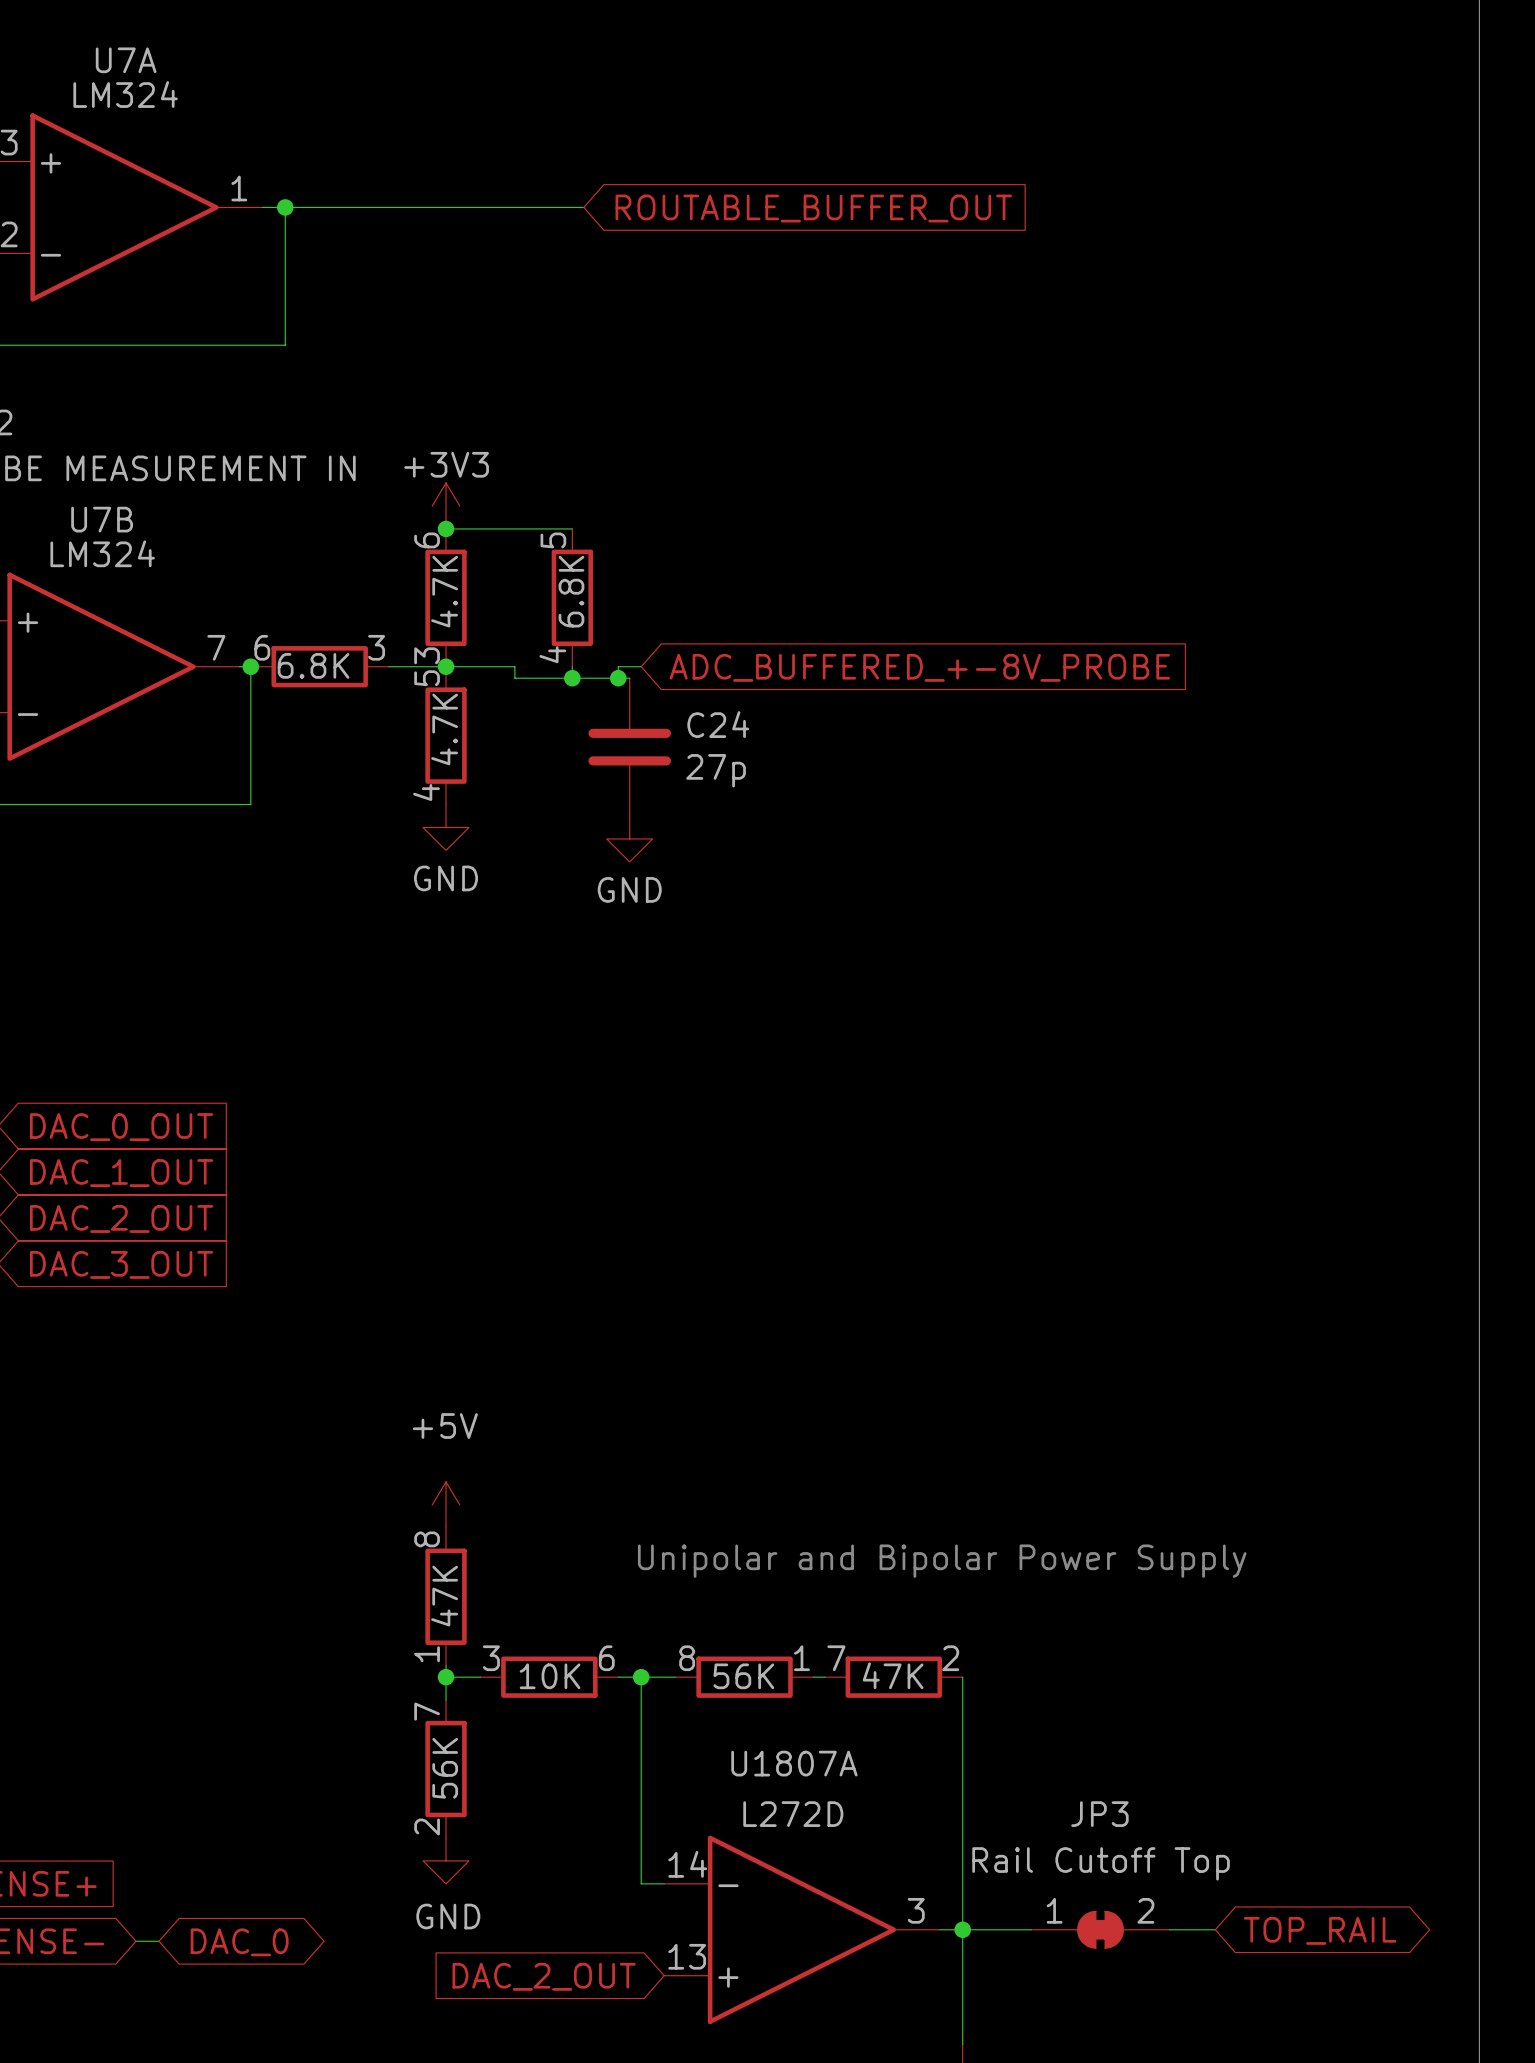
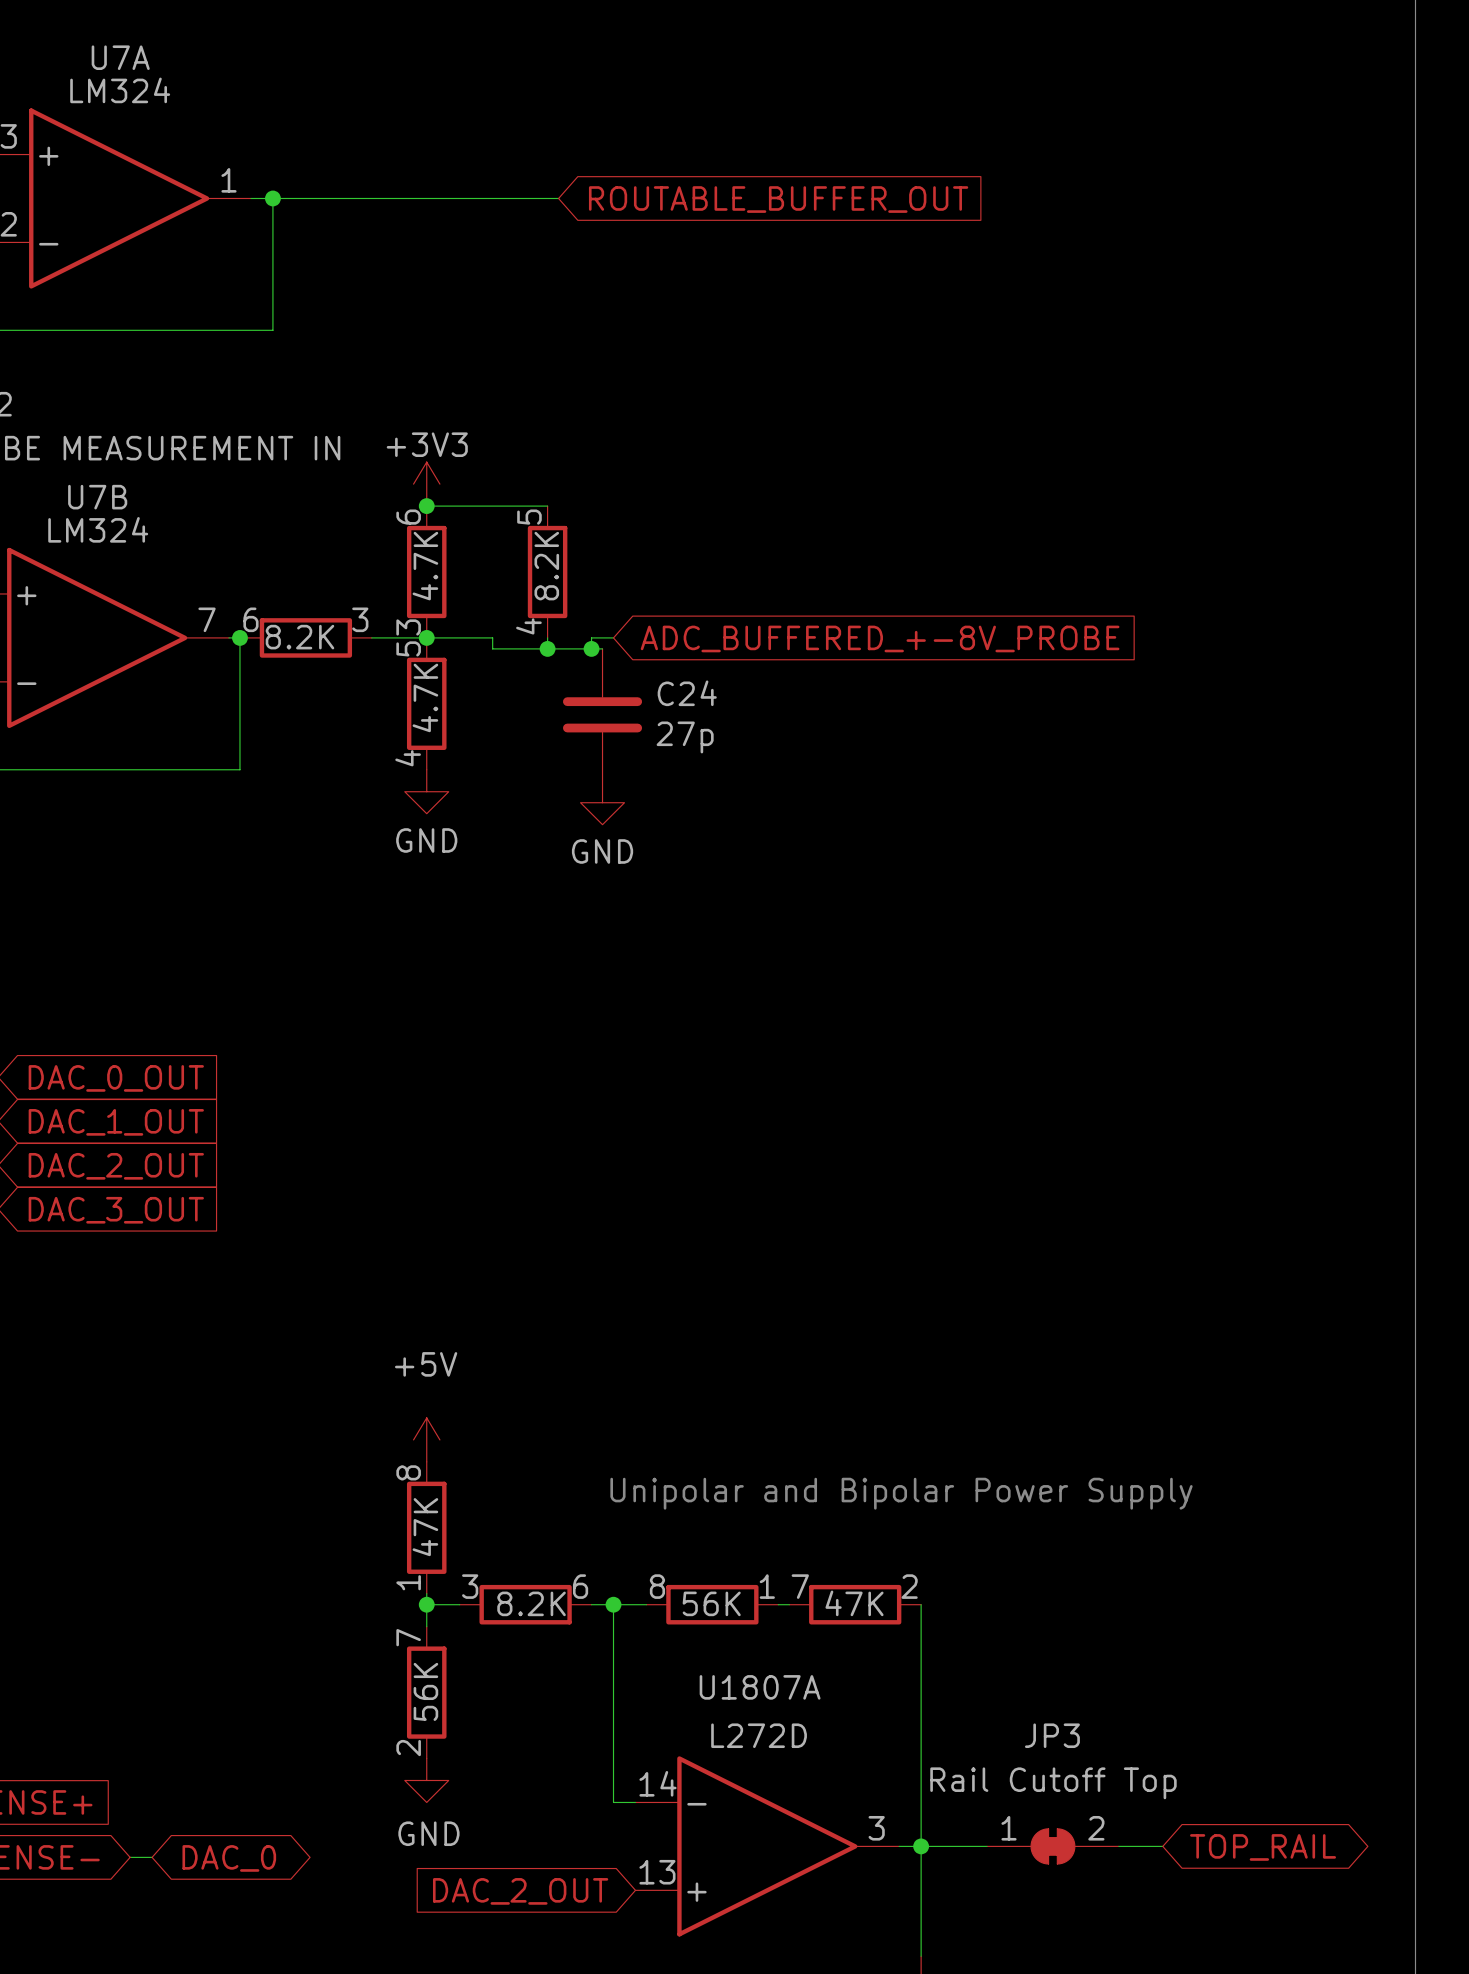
part value: 6.8K (571, 591) -> 8.2K (546, 566)
part value: 6.8K (313, 665) -> 8.2K (299, 637)
part value: 10K (550, 1676) -> 8.2K (531, 1603)

